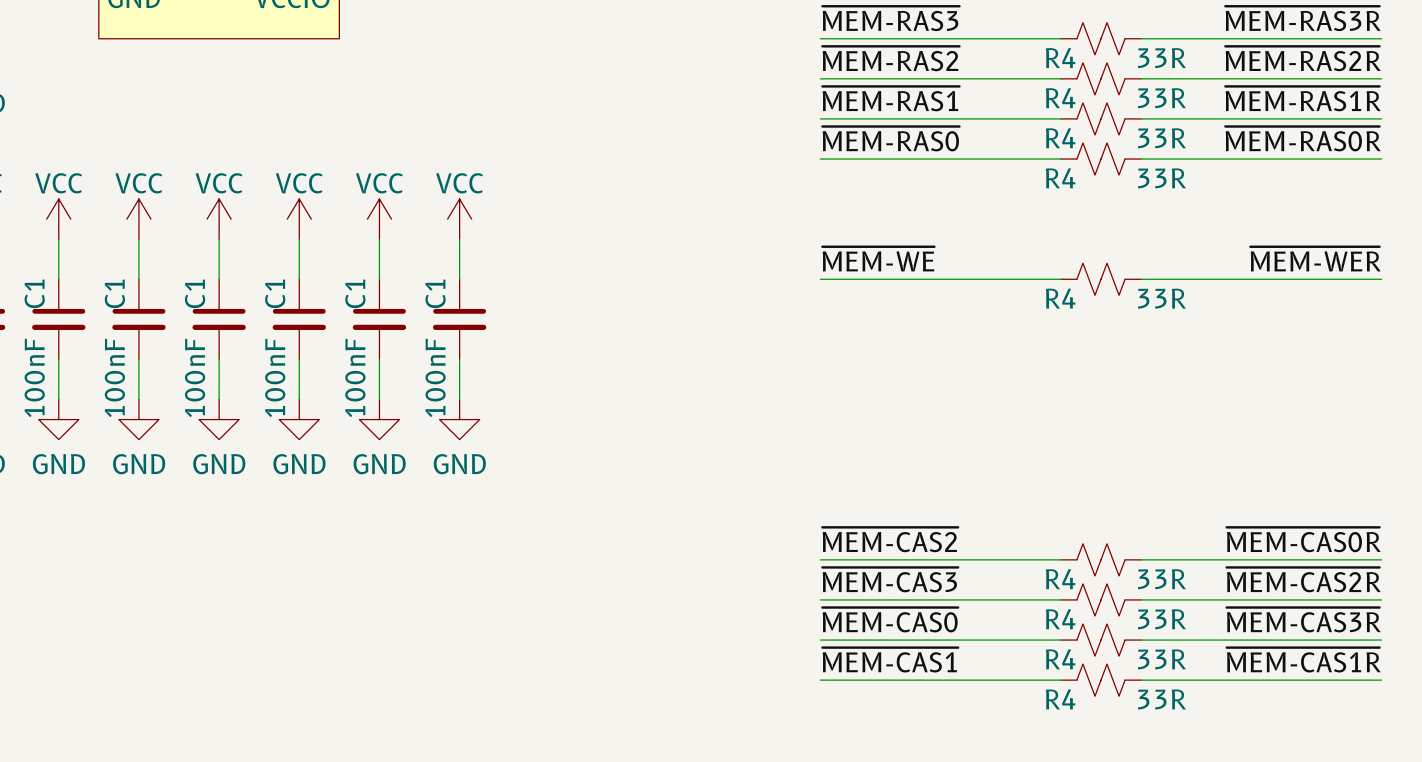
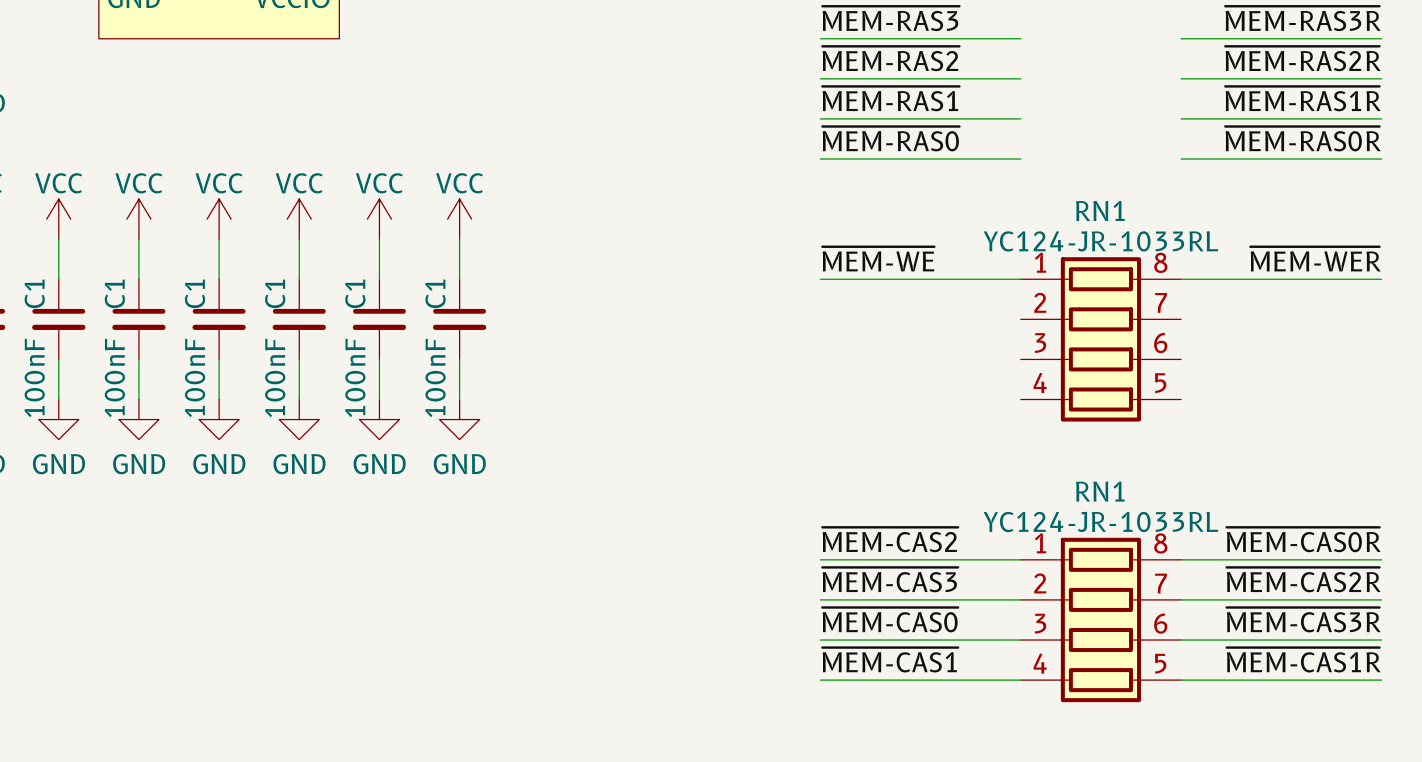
wire: (1020, 38) (1060, 38) -> none
R4: 33R (1100, 38) -> none
wire: (1141, 38) (1181, 38) -> none
wire: (1020, 78) (1060, 78) -> none
R4: 33R (1100, 78) -> none
wire: (1141, 78) (1181, 78) -> none
wire: (1020, 118) (1060, 118) -> none
R4: 33R (1100, 118) -> none
wire: (1141, 118) (1181, 118) -> none
wire: (1020, 159) (1060, 159) -> none
R4: 33R (1100, 159) -> none
wire: (1141, 159) (1181, 159) -> none
R4: 33R (1100, 279) -> none
RN1: none -> YC124-JR-1033RL (1100, 339)
R4: 33R (1100, 559) -> none
R4: 33R (1100, 599) -> none
RN1: none -> YC124-JR-1033RL (1100, 619)
R4: 33R (1100, 640) -> none
R4: 33R (1100, 680) -> none

